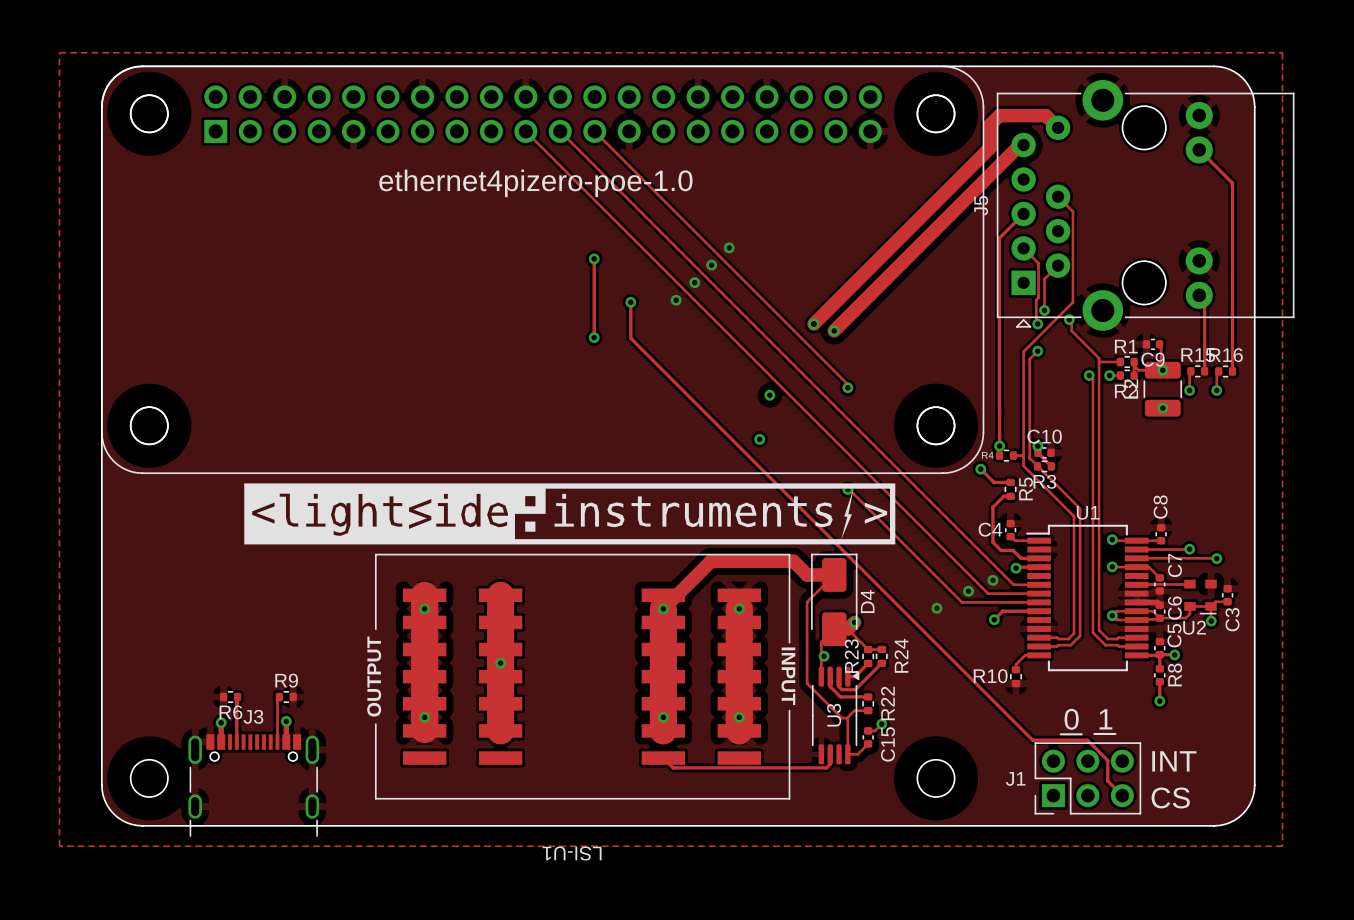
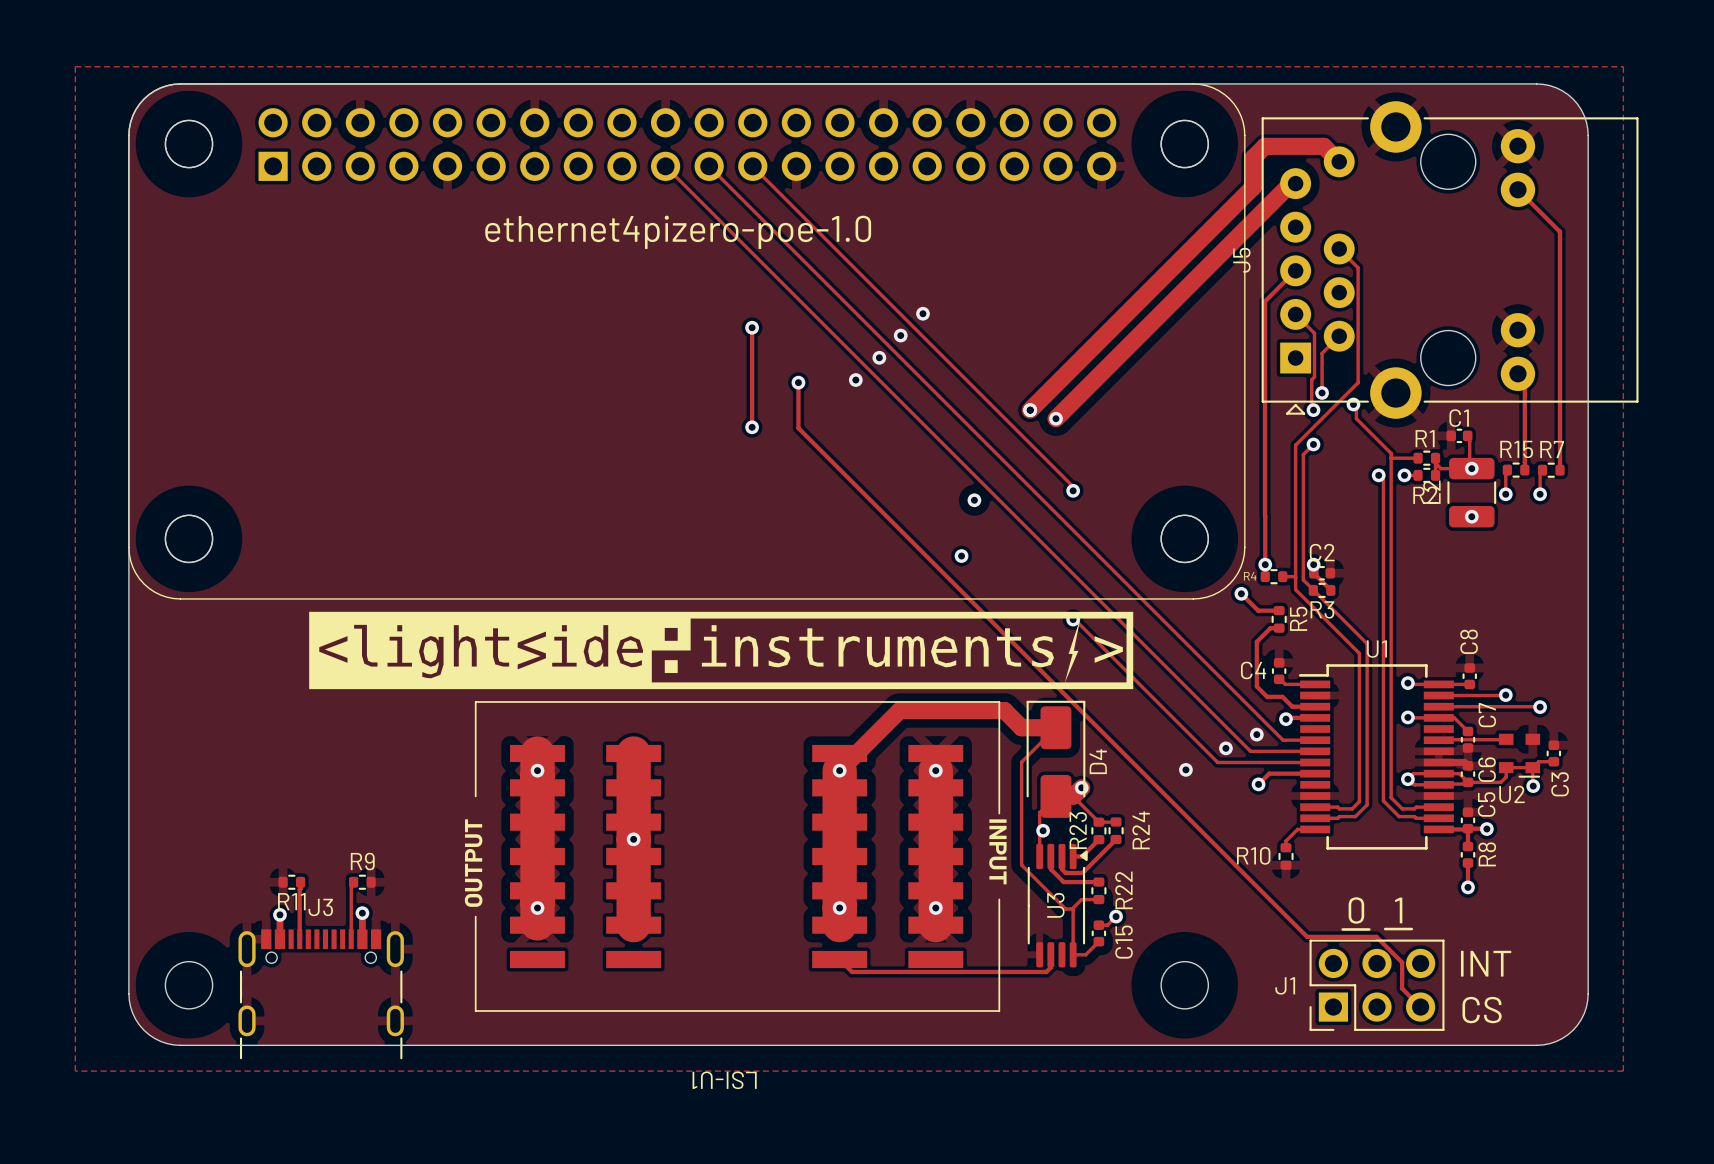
R16 name: R16 (1225, 355) -> R7 (1552, 449)
C9 name: C9 (1153, 359) -> C1 (1459, 418)
C10 name: C10 (1044, 436) -> C2 (1322, 552)
R6 name: R6 (230, 712) -> R11 (291, 901)

